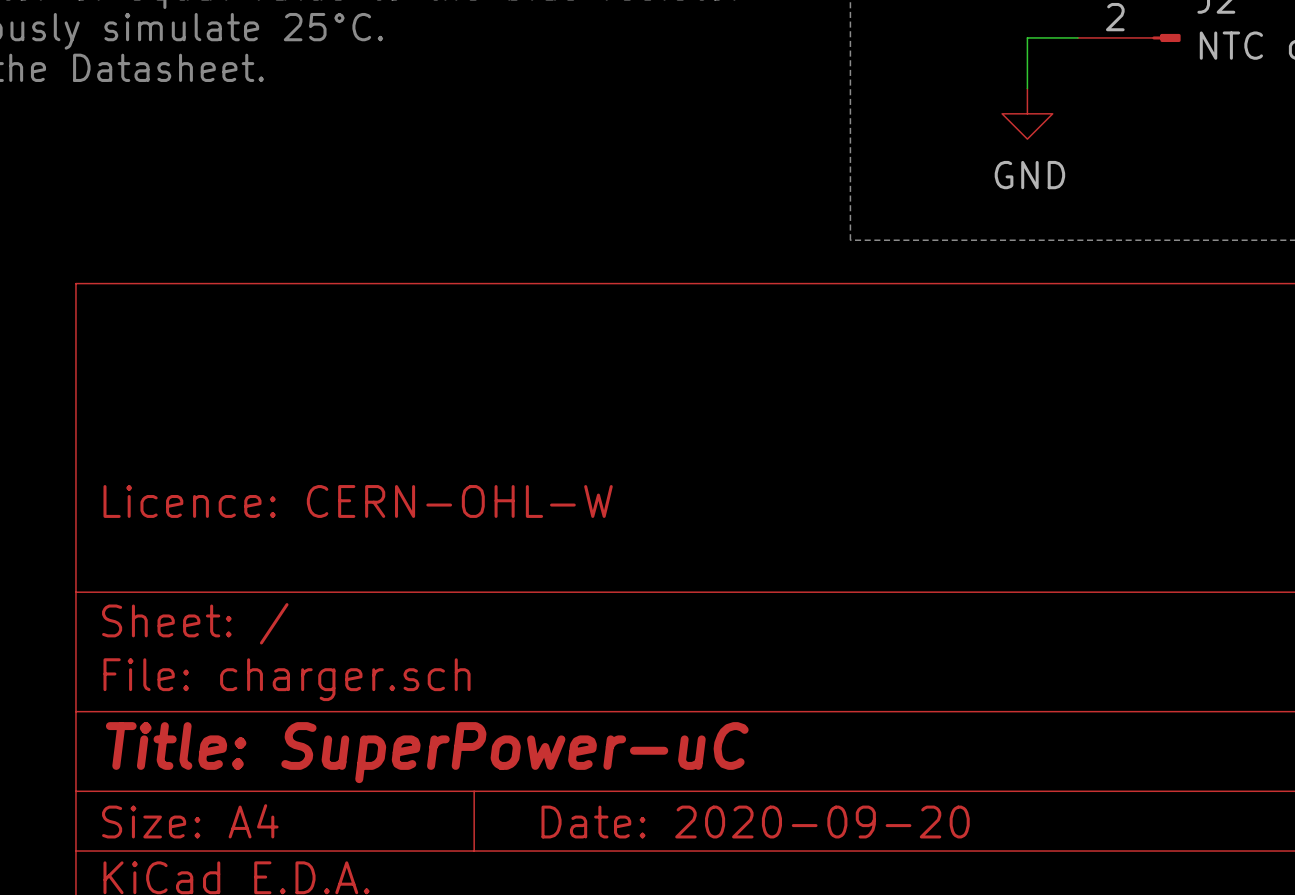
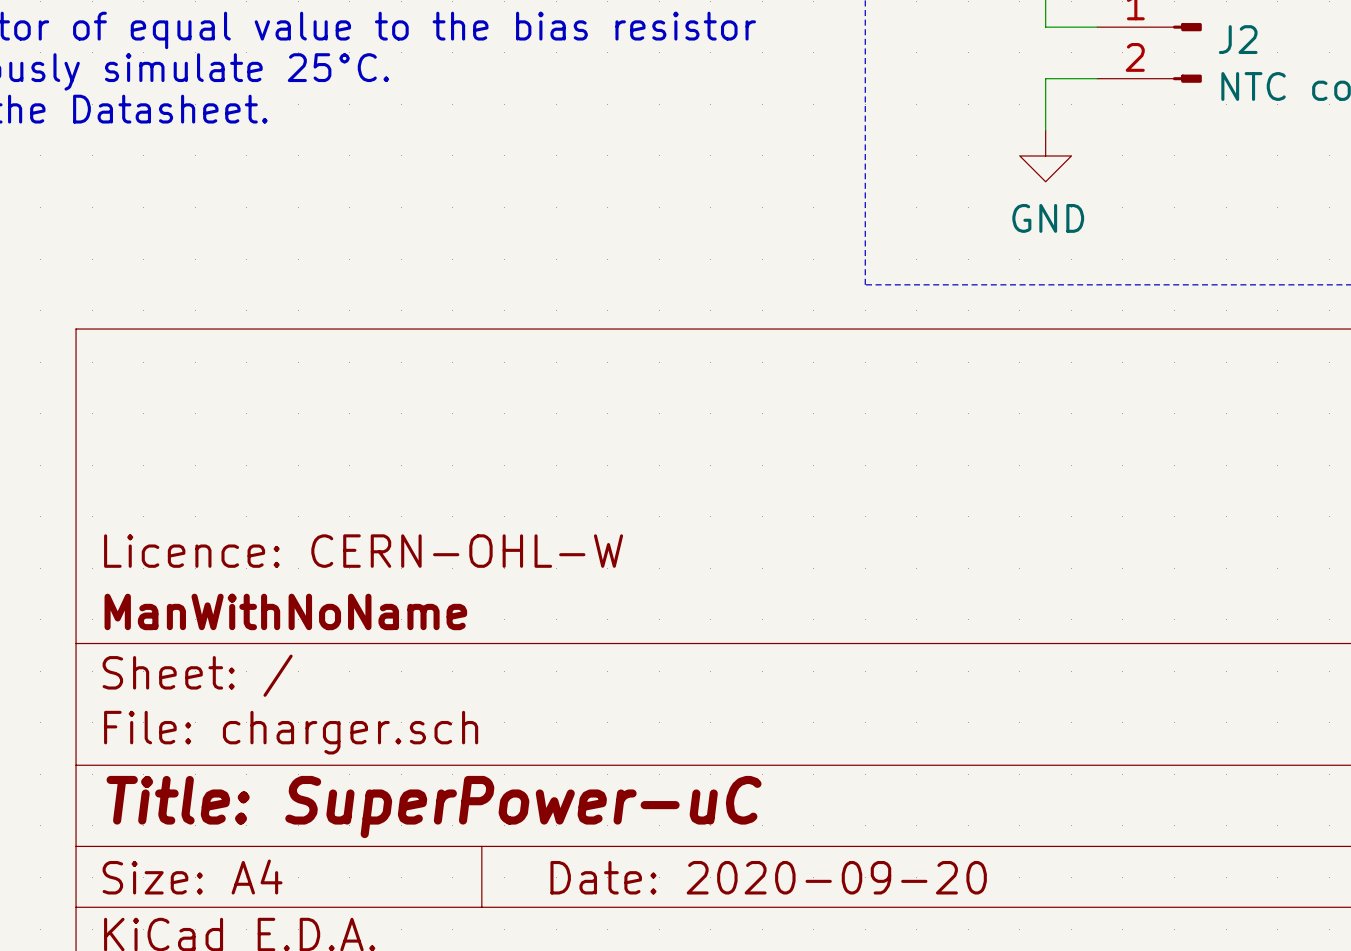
title block: none -> ManWithNoName (285, 611)

